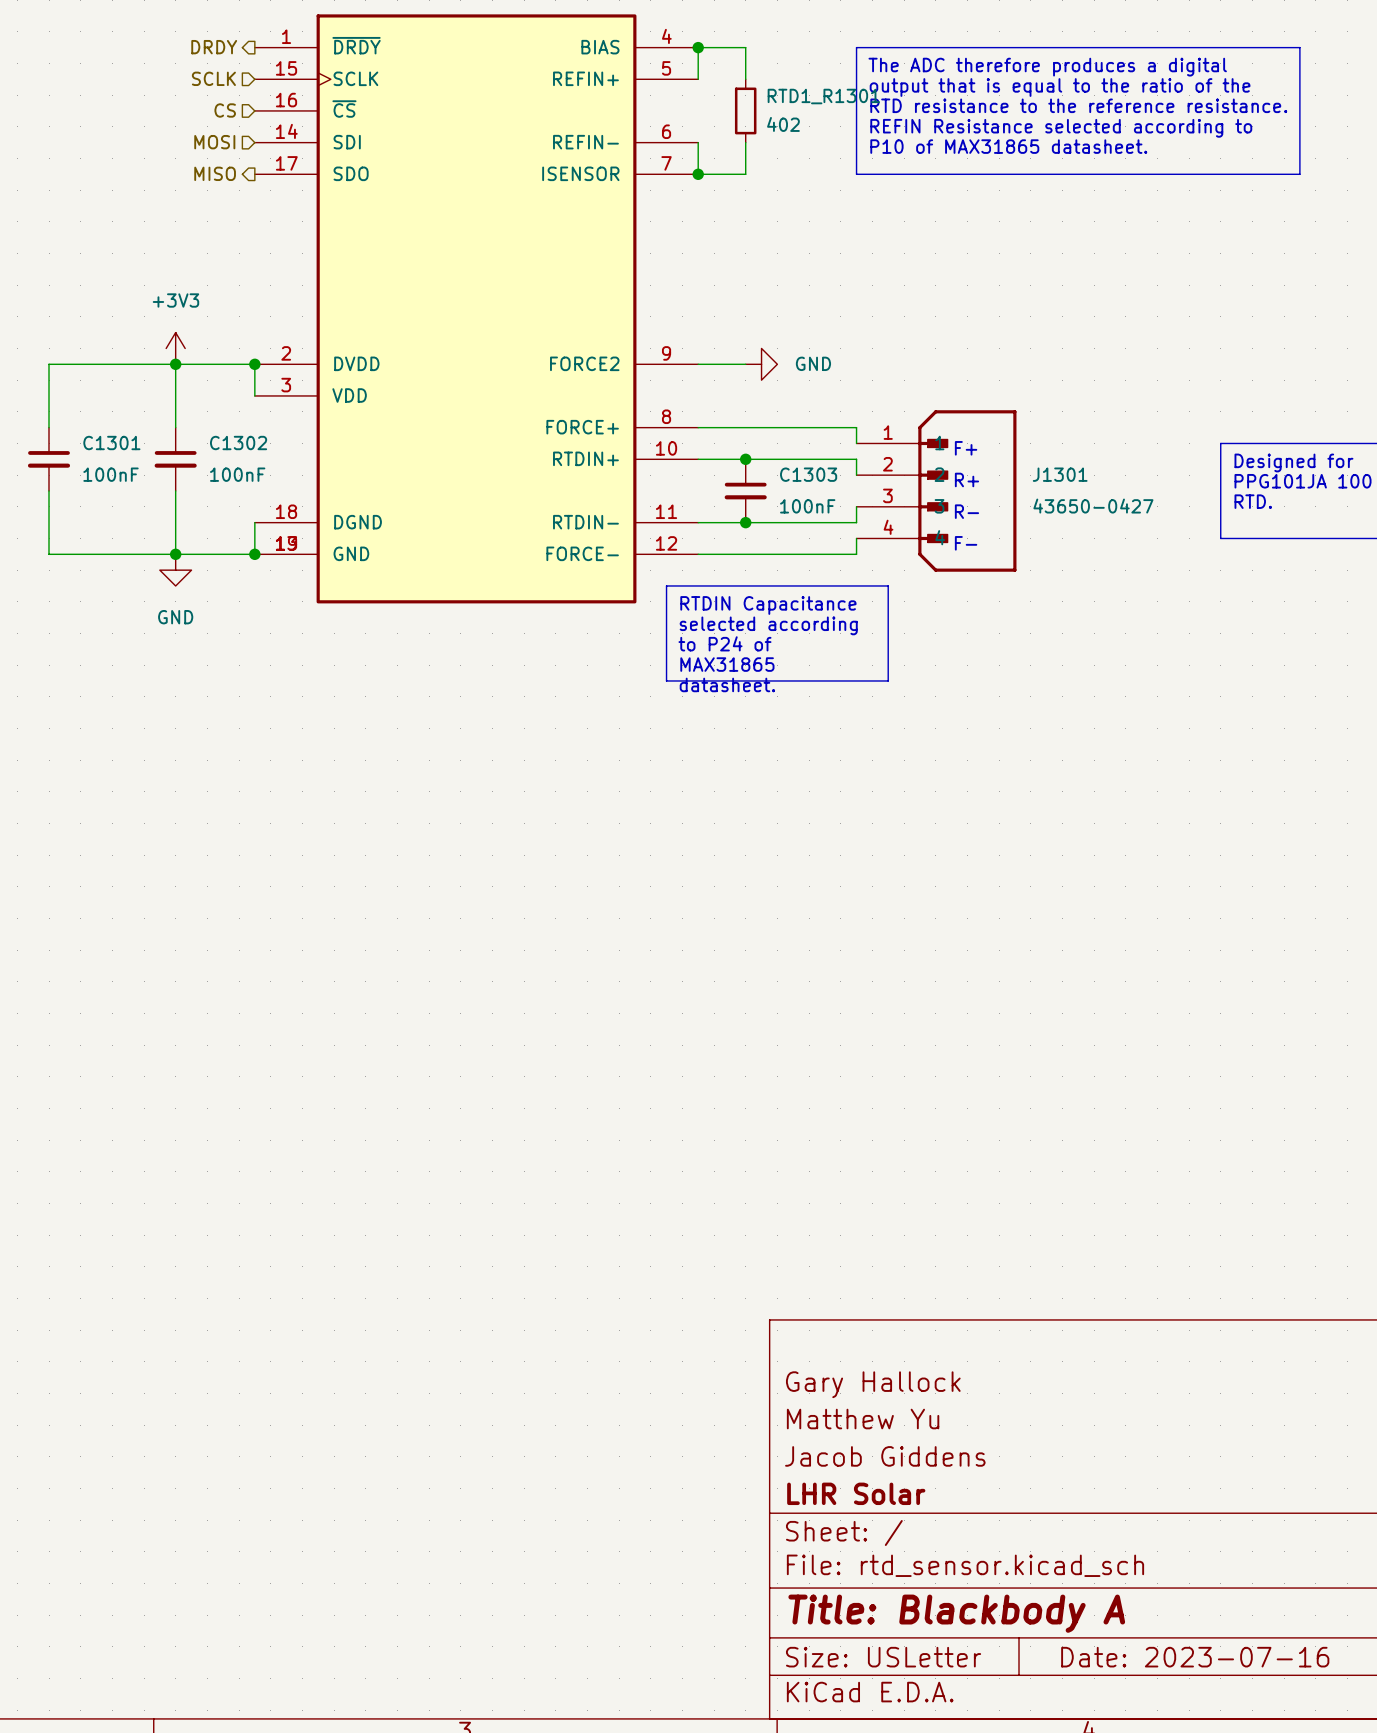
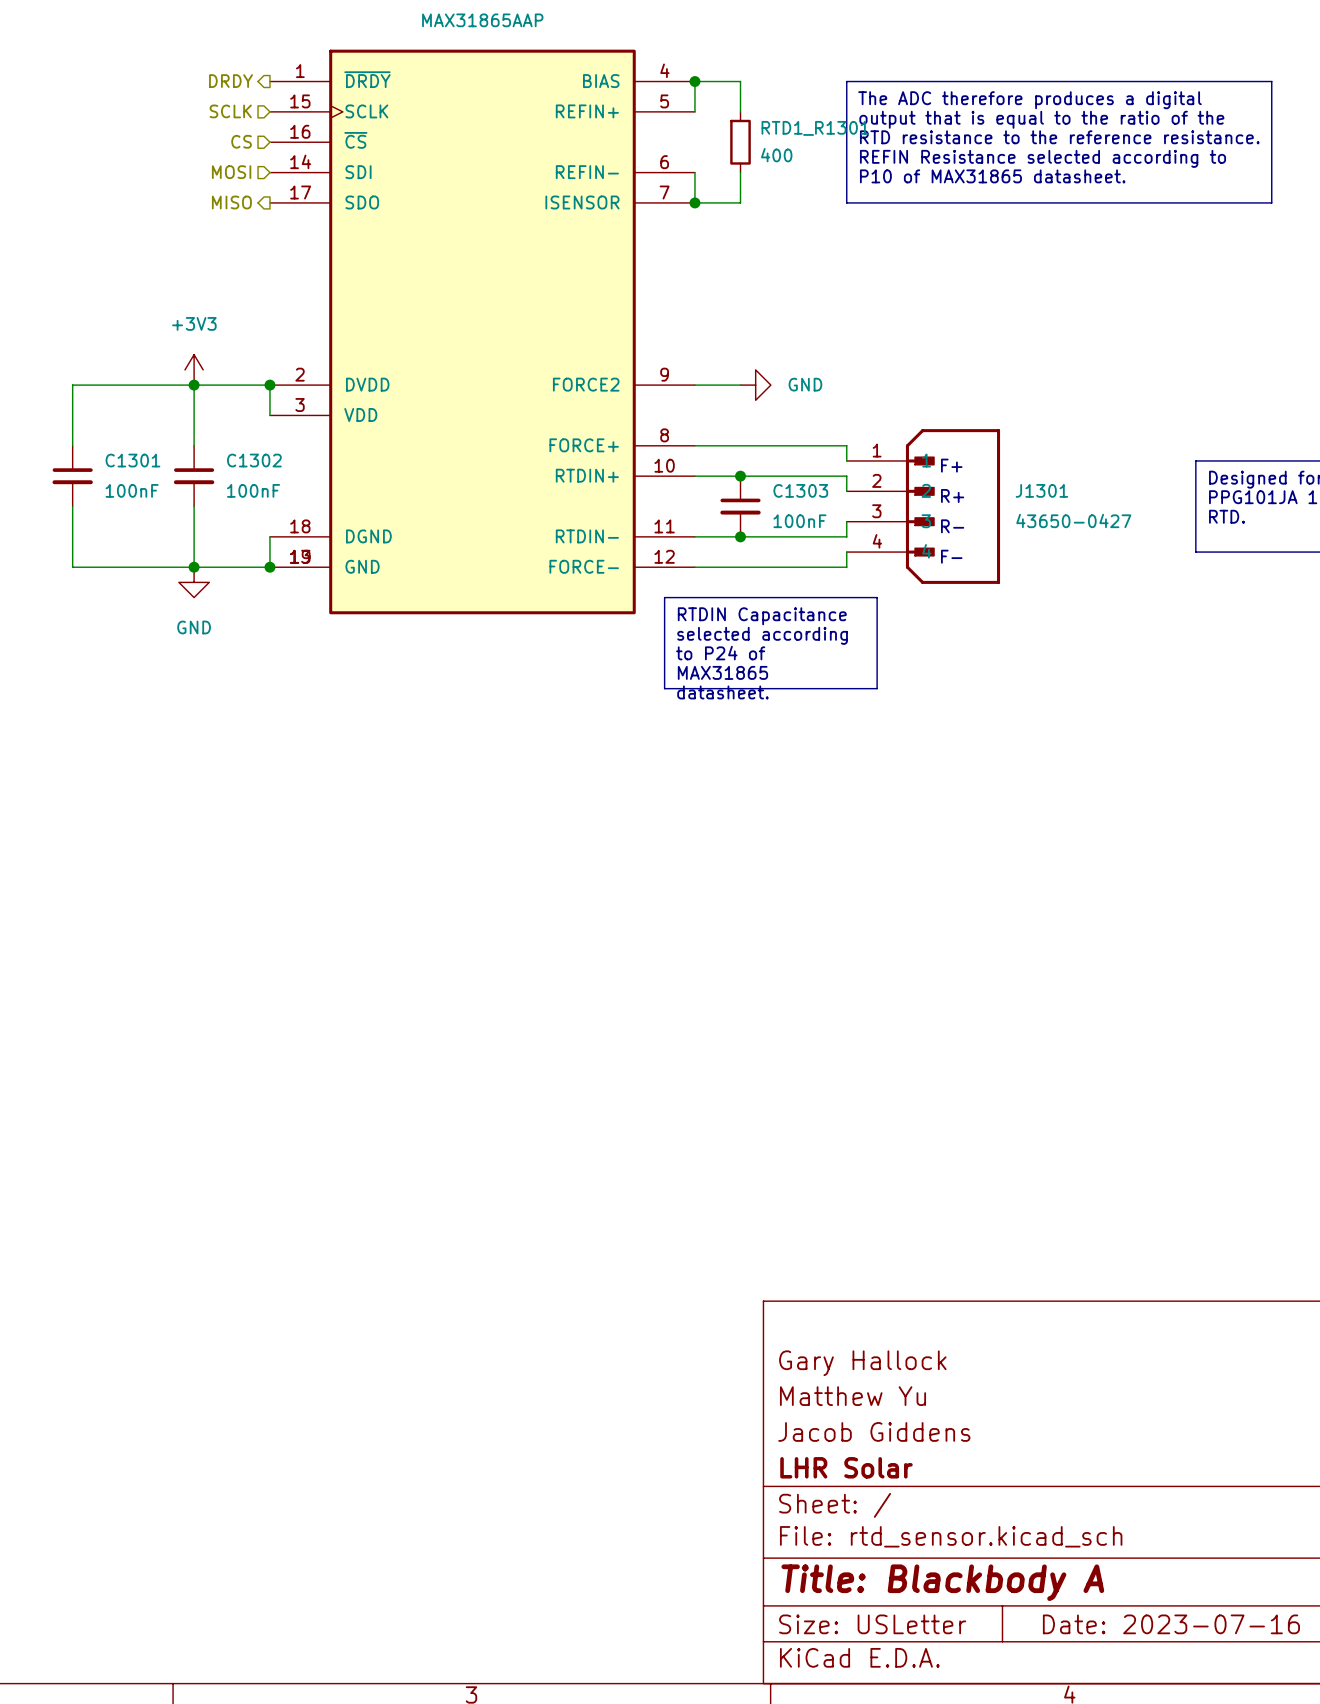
RTD1_R1301 value: 402 (783, 124) -> 400 (776, 155)

